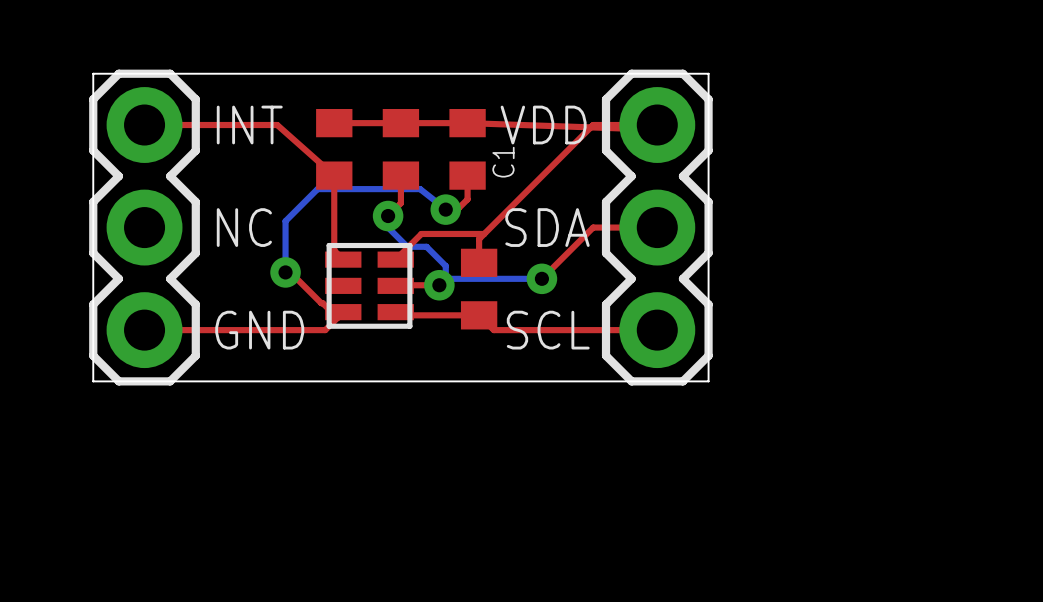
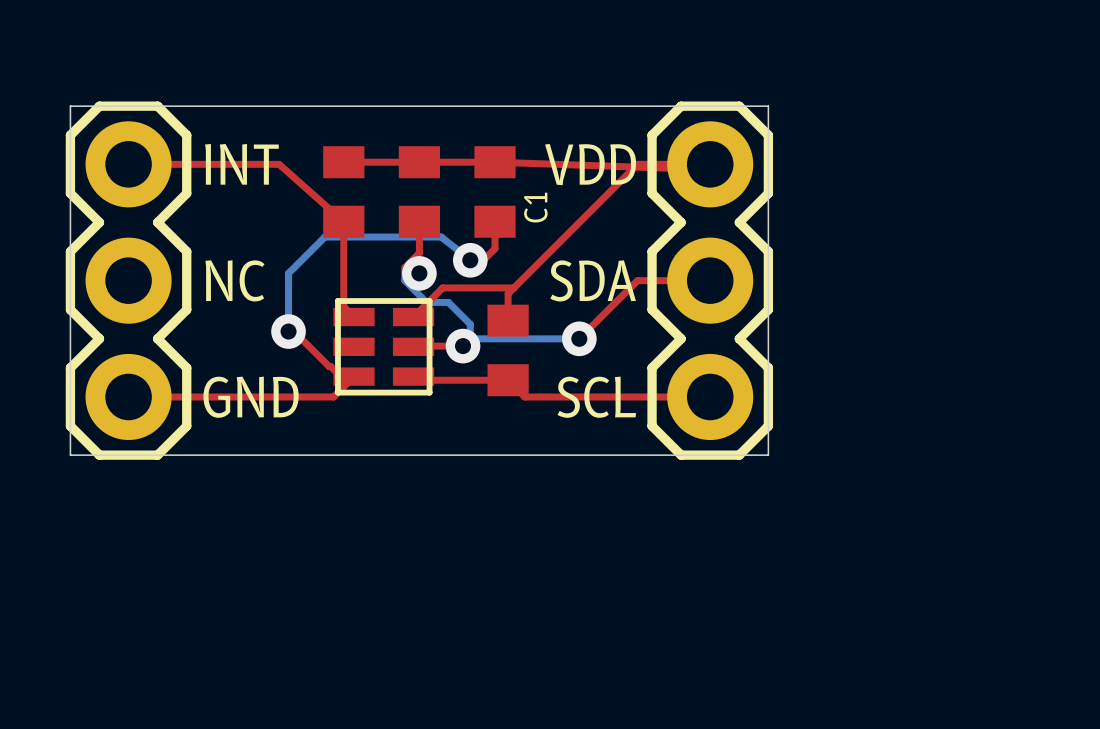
via position: (388, 216) -> (419, 273)

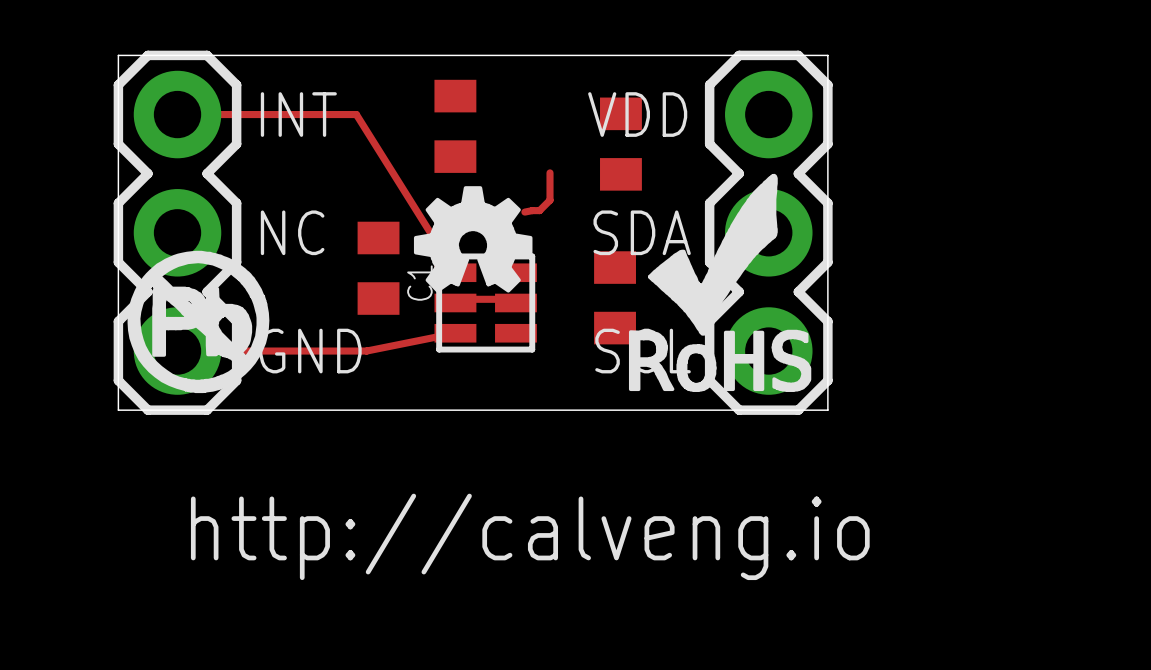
top track: (343, 162) (495, 162) (705, 169) (710, 164) (637, 164) (508, 293) (508, 320) -> none
top track: (279, 164) (343, 221) (343, 306) (354, 317) -> (330, 114) (356, 114) (455, 272)
part: (343, 191) -> none
part position: (419, 191) -> (455, 126)
C1 position: (495, 191) -> (378, 268)
part: none -> (620, 144)
top track: (419, 221) (419, 253) (404, 267) -> none
drawing: none -> [628, 173, 812, 392]
drawing: none -> [413, 186, 533, 293]
bottom track: (470, 260) (441, 237) (324, 237) (288, 273) (288, 331) -> none
via: (470, 260) -> none
bottom track: (404, 267) (404, 280) (426, 302) (448, 302) (470, 324) (470, 338) -> none
via: (419, 273) -> none
top track: (710, 280) (637, 280) (579, 338) -> none
top track: (513, 287) (442, 287) (413, 317) -> none
drawing: none -> [127, 250, 270, 394]
top track: (288, 331) (294, 331) (347, 383) -> none
via: (288, 331) -> none
bottom track: (470, 338) (579, 338) -> none
via: (579, 338) -> none
part position: (383, 346) -> (485, 302)
via: (463, 346) -> none
part position: (508, 350) -> (615, 297)
top track: (354, 376) (333, 396) (314, 396) -> (455, 333) (366, 351)
top track: (413, 376) (417, 380) (508, 380) (524, 396) (710, 396) -> none
drawing: none -> [190, 493, 870, 581]

